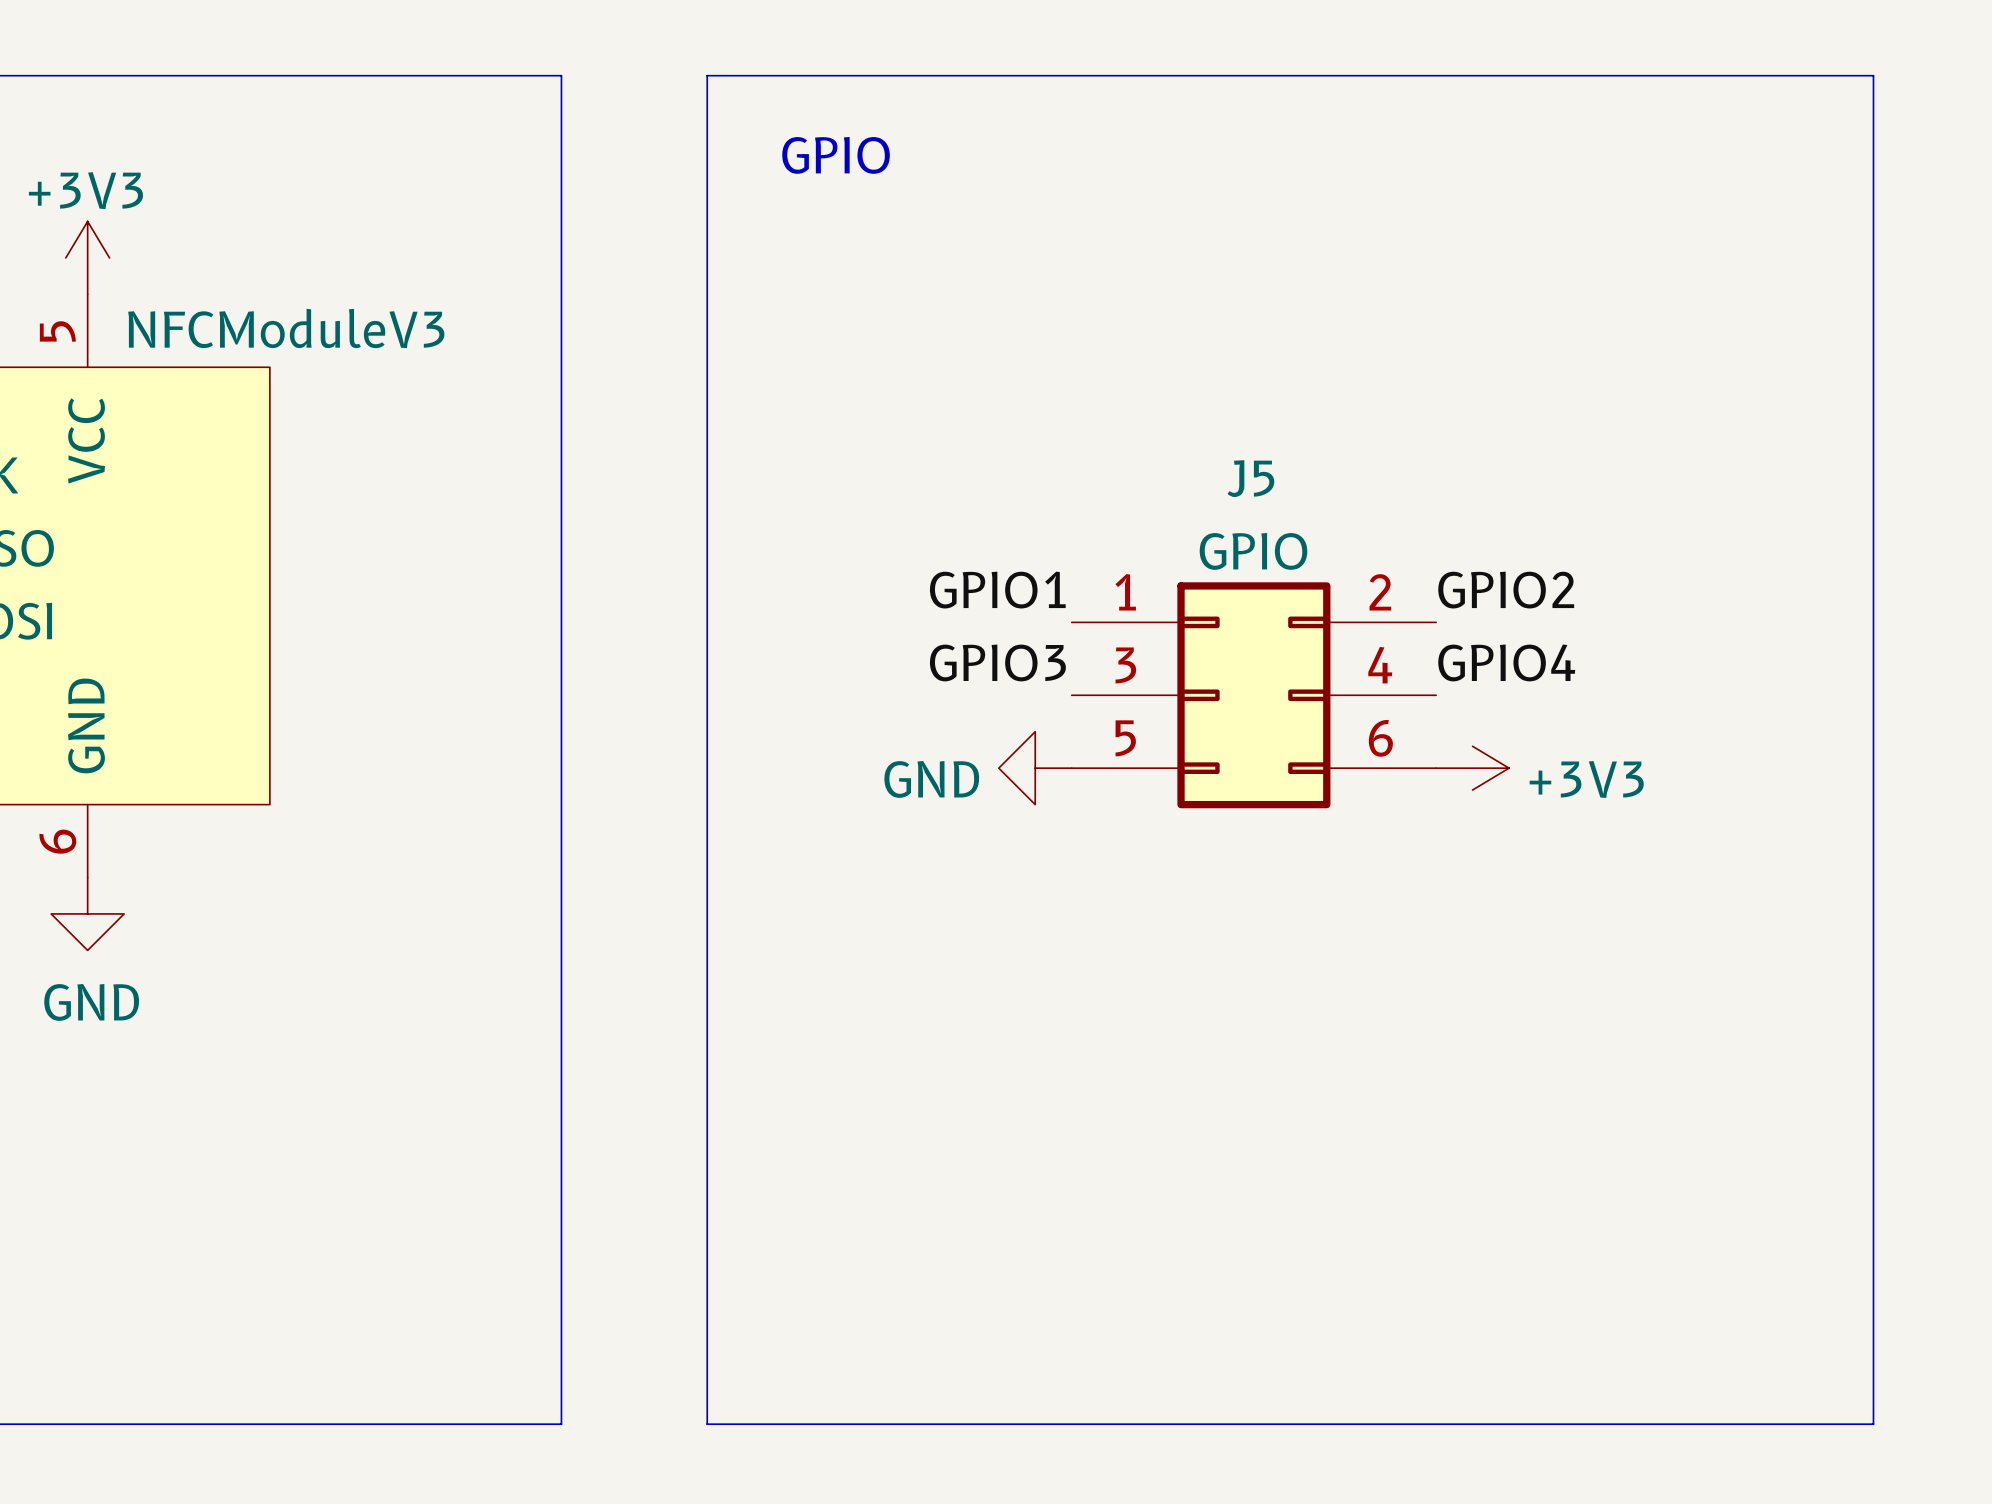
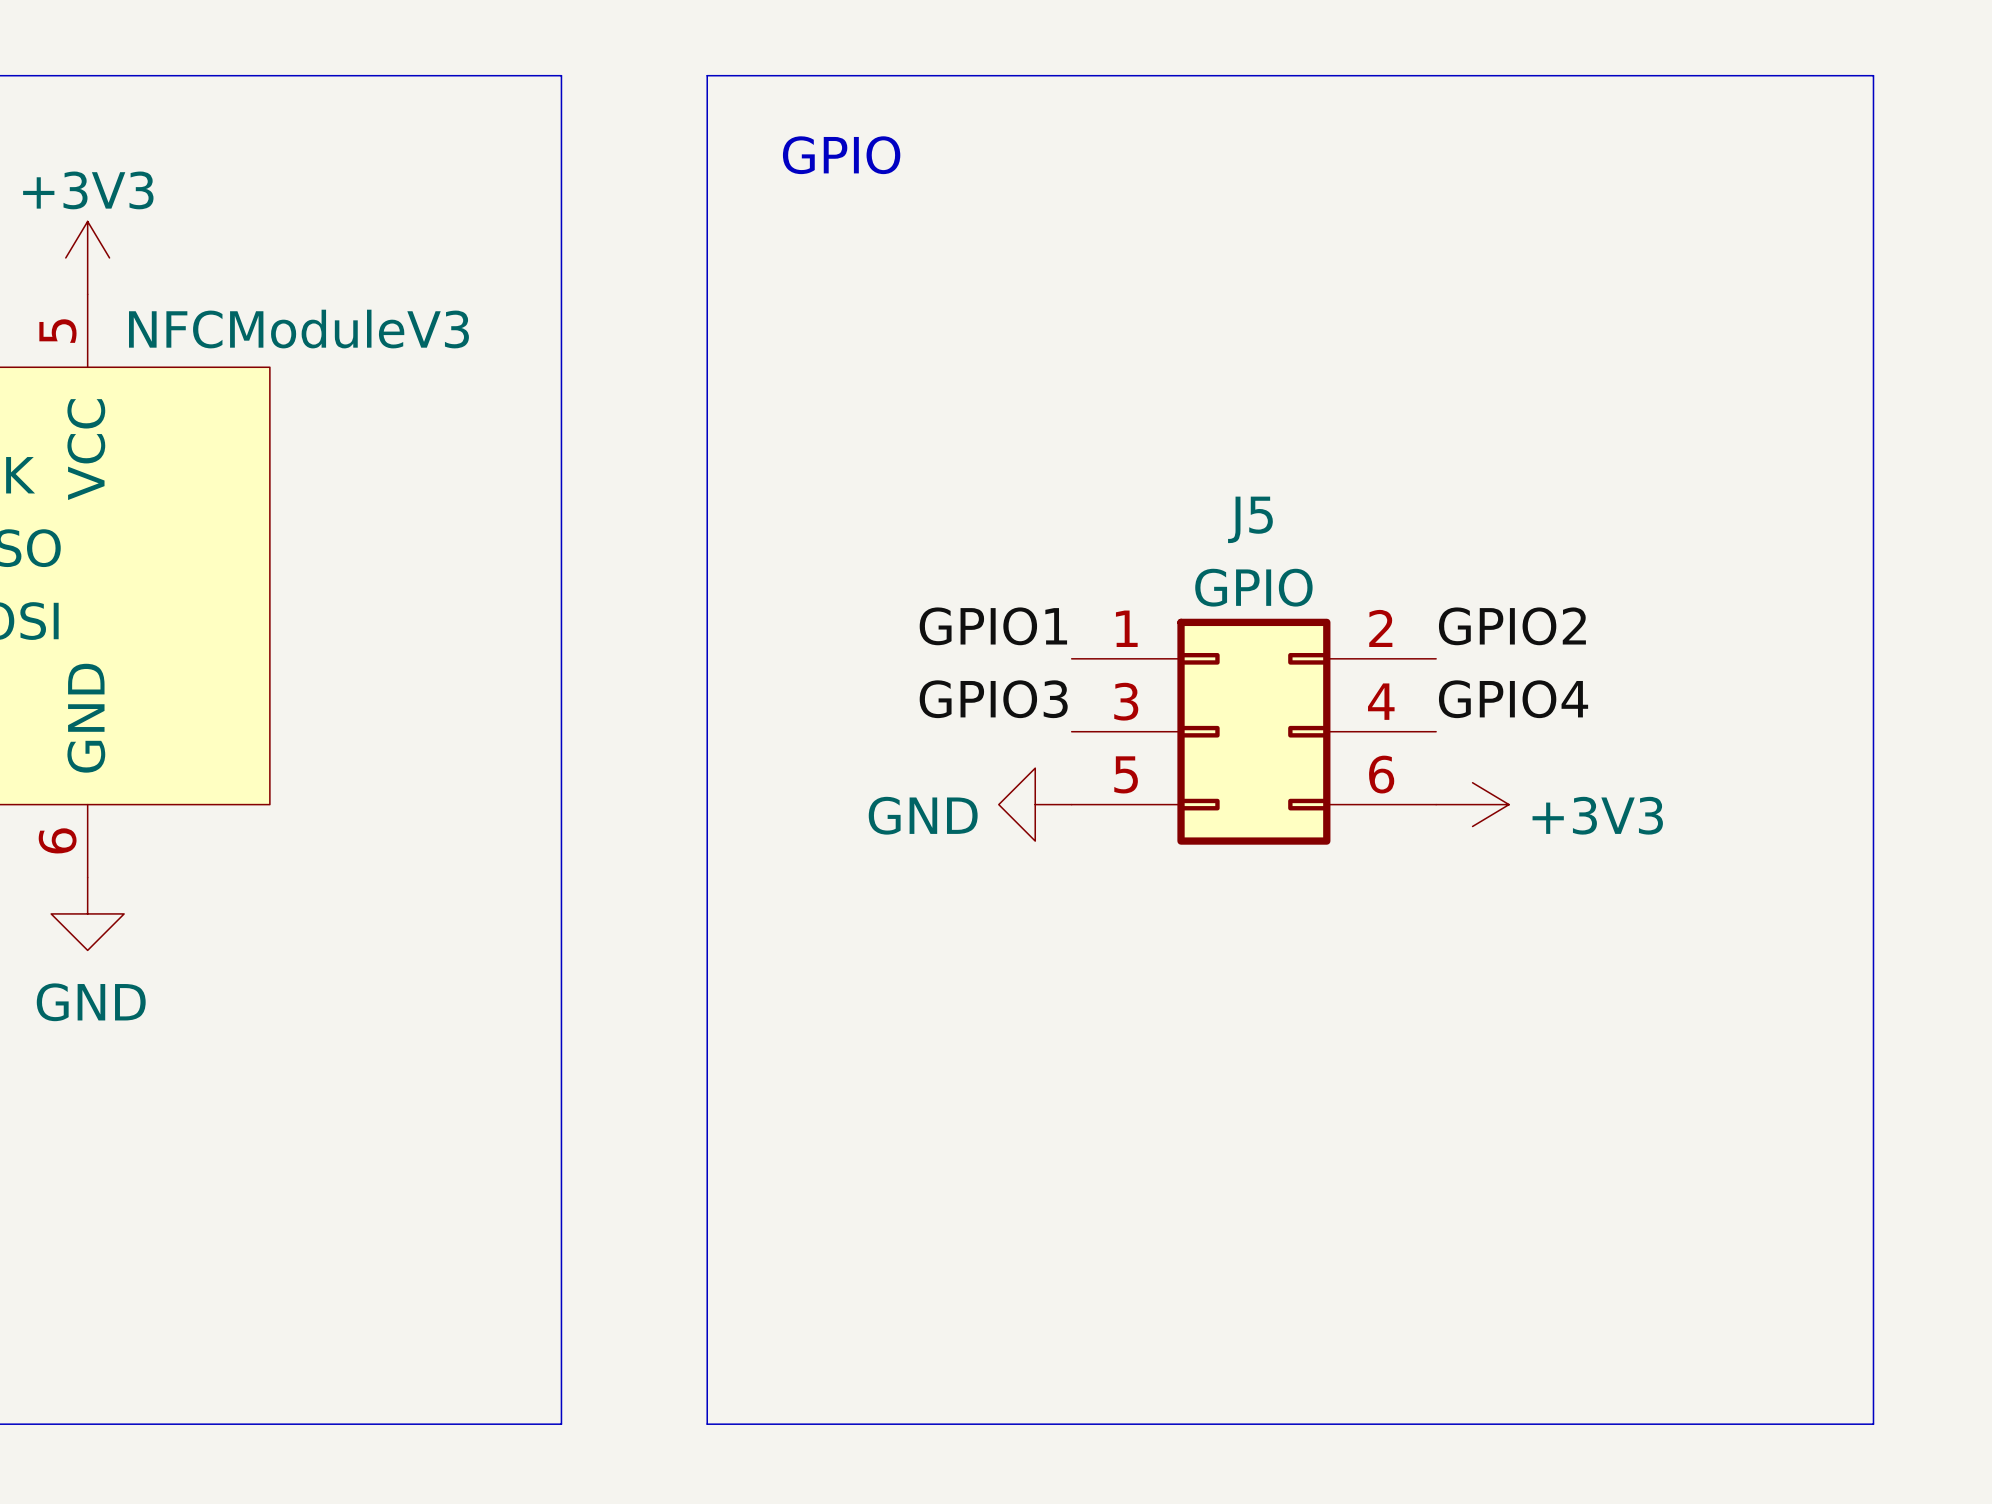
label position: GPIO1 (997, 590) -> GPIO1 (993, 626)
label position: GPIO2 (1506, 590) -> GPIO2 (1512, 626)
label position: GPIO3 (997, 662) -> GPIO3 (993, 699)
label position: GPIO4 (1506, 662) -> GPIO4 (1513, 699)
J5 position: (1253, 695) -> (1253, 731)
power symbol position: GND (1035, 768) -> GND (1035, 804)
power symbol position: +3V3 (1472, 768) -> +3V3 (1472, 804)

